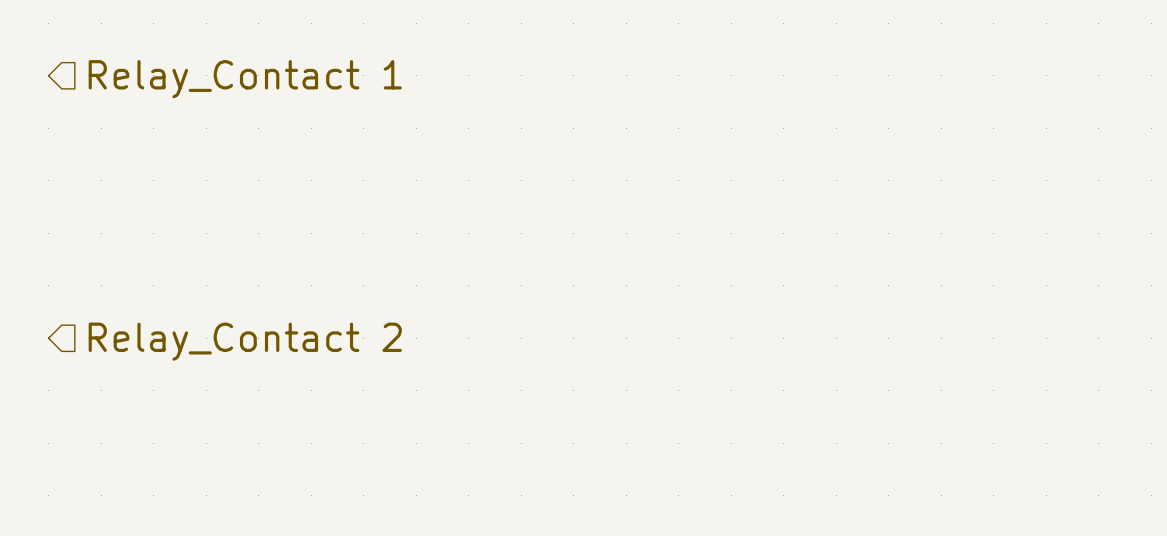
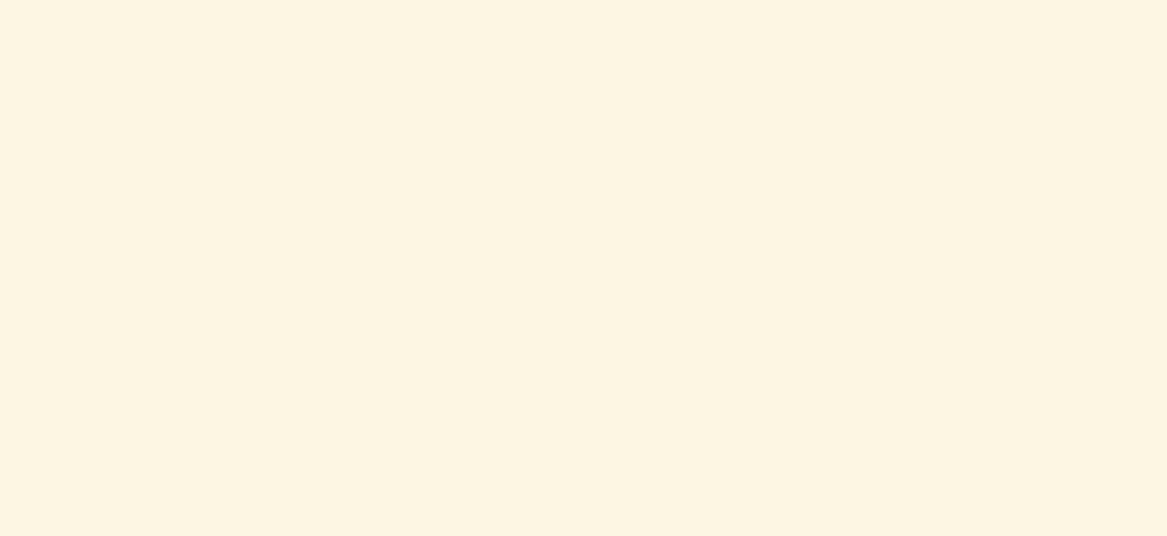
hierarchical label: Relay_Contact 1 (245, 79) -> none
hierarchical label: Relay_Contact 2 (245, 341) -> none

